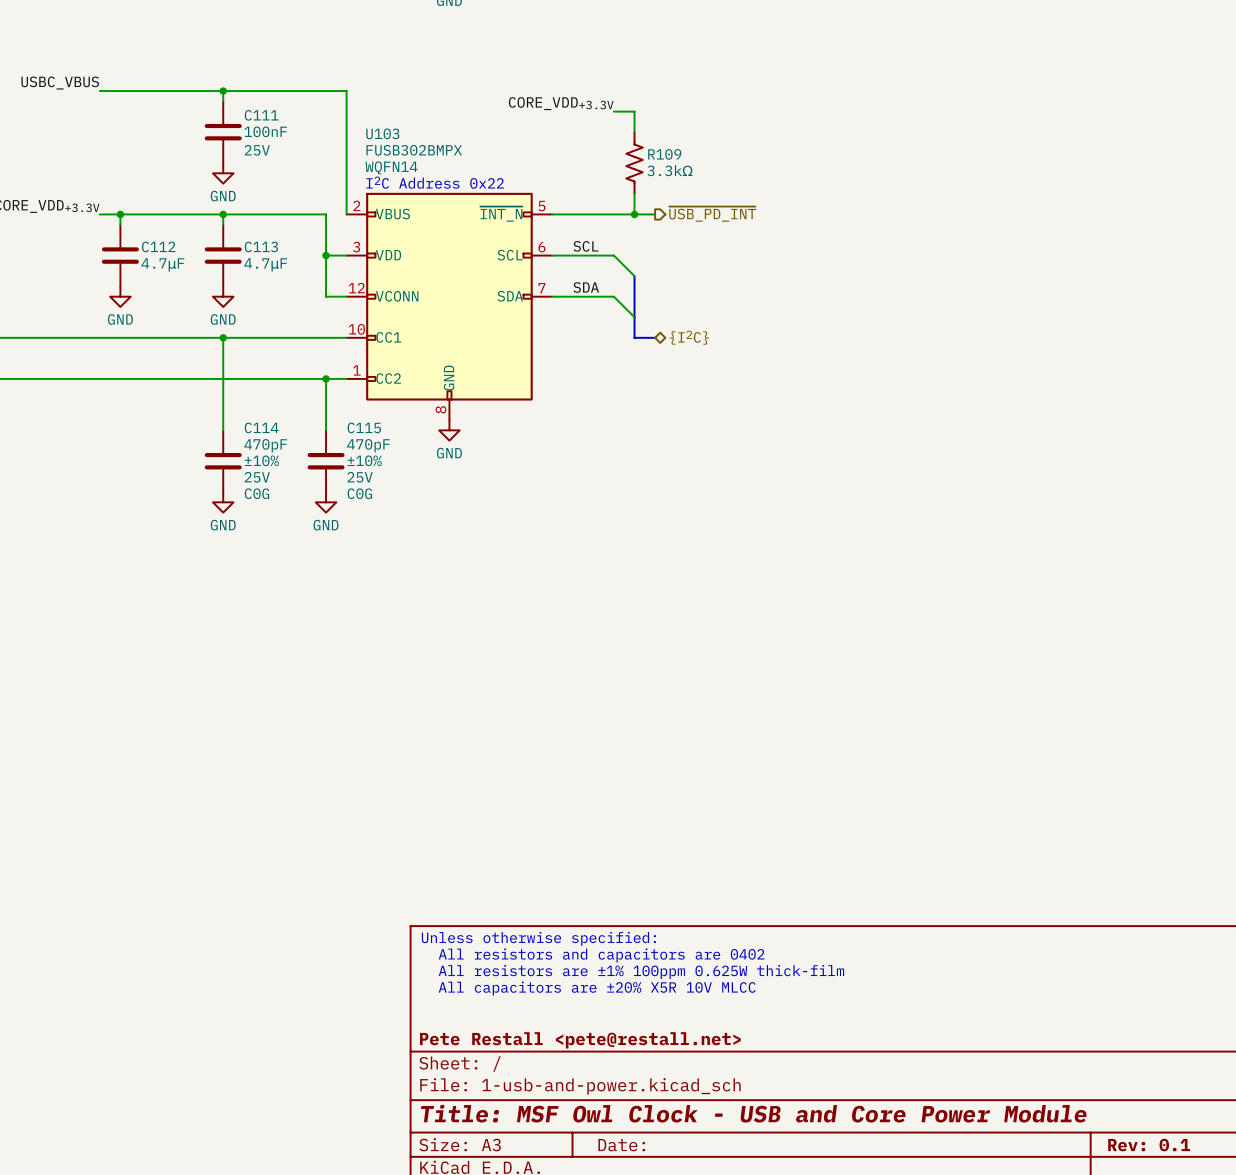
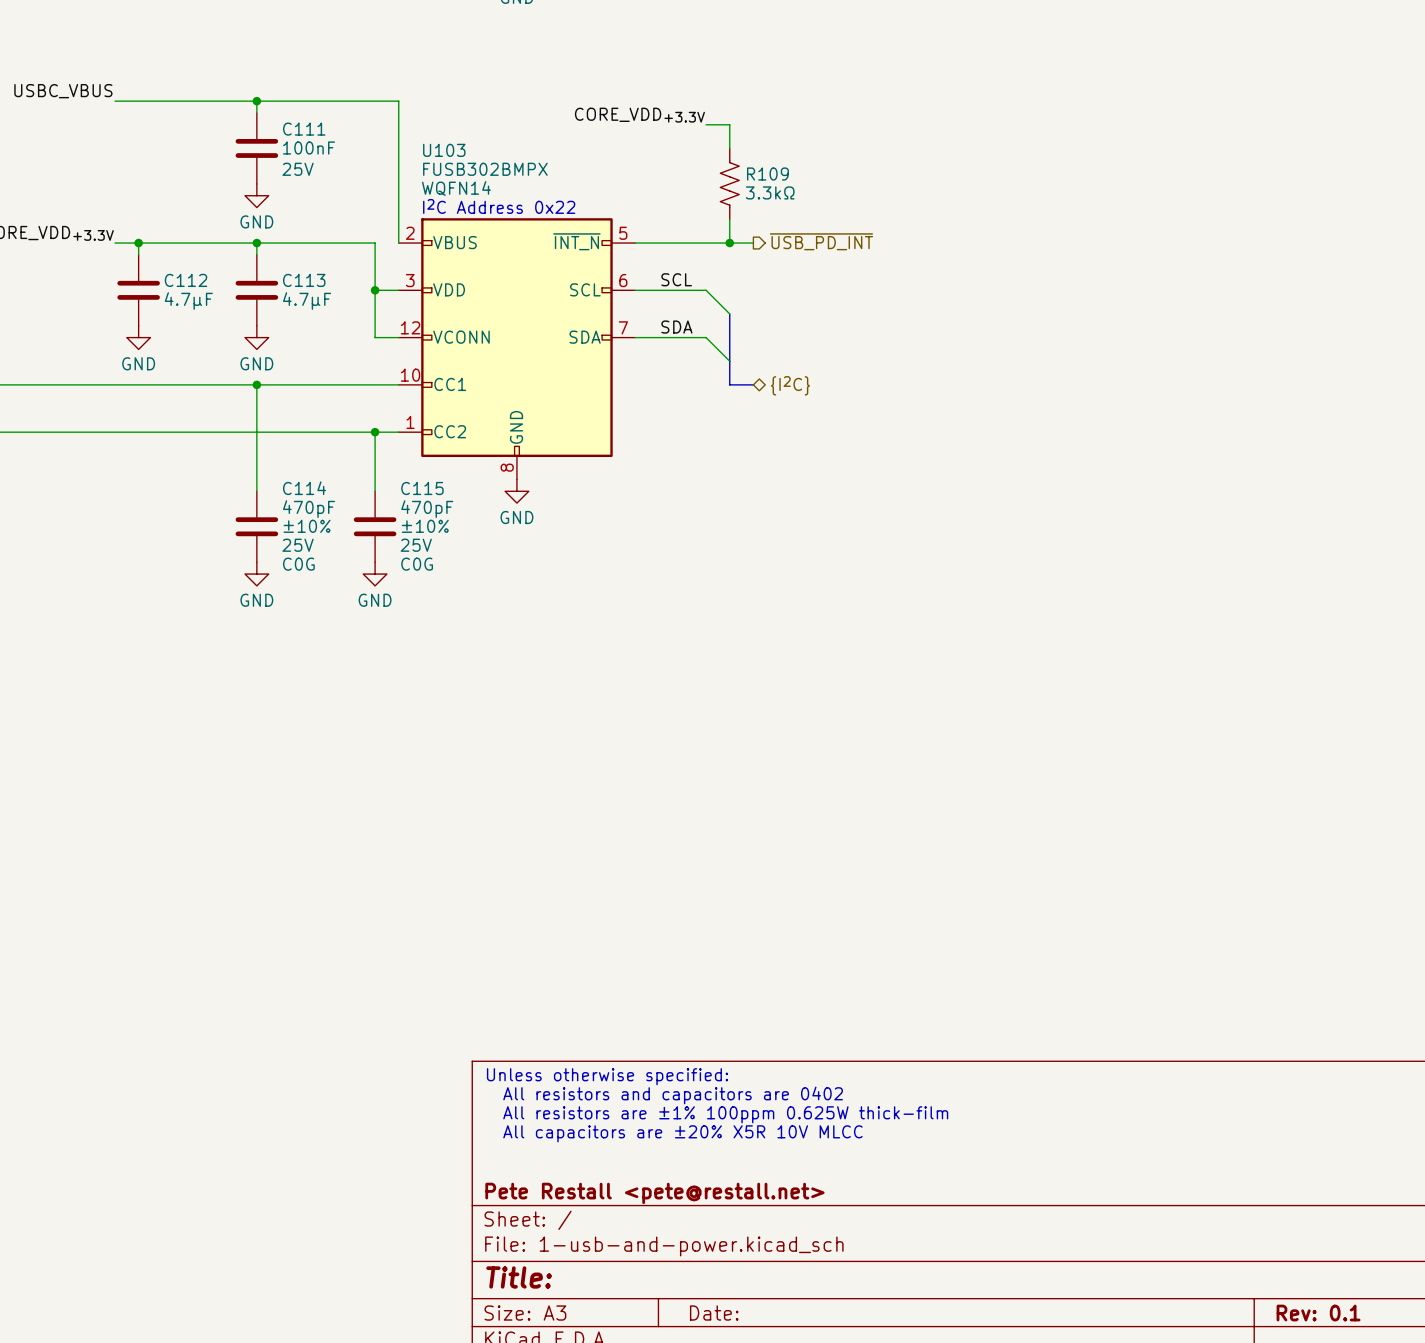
title block: Title: MSF Owl Clock - USB and Core Power Module (753, 1113) -> Title: (519, 1277)

